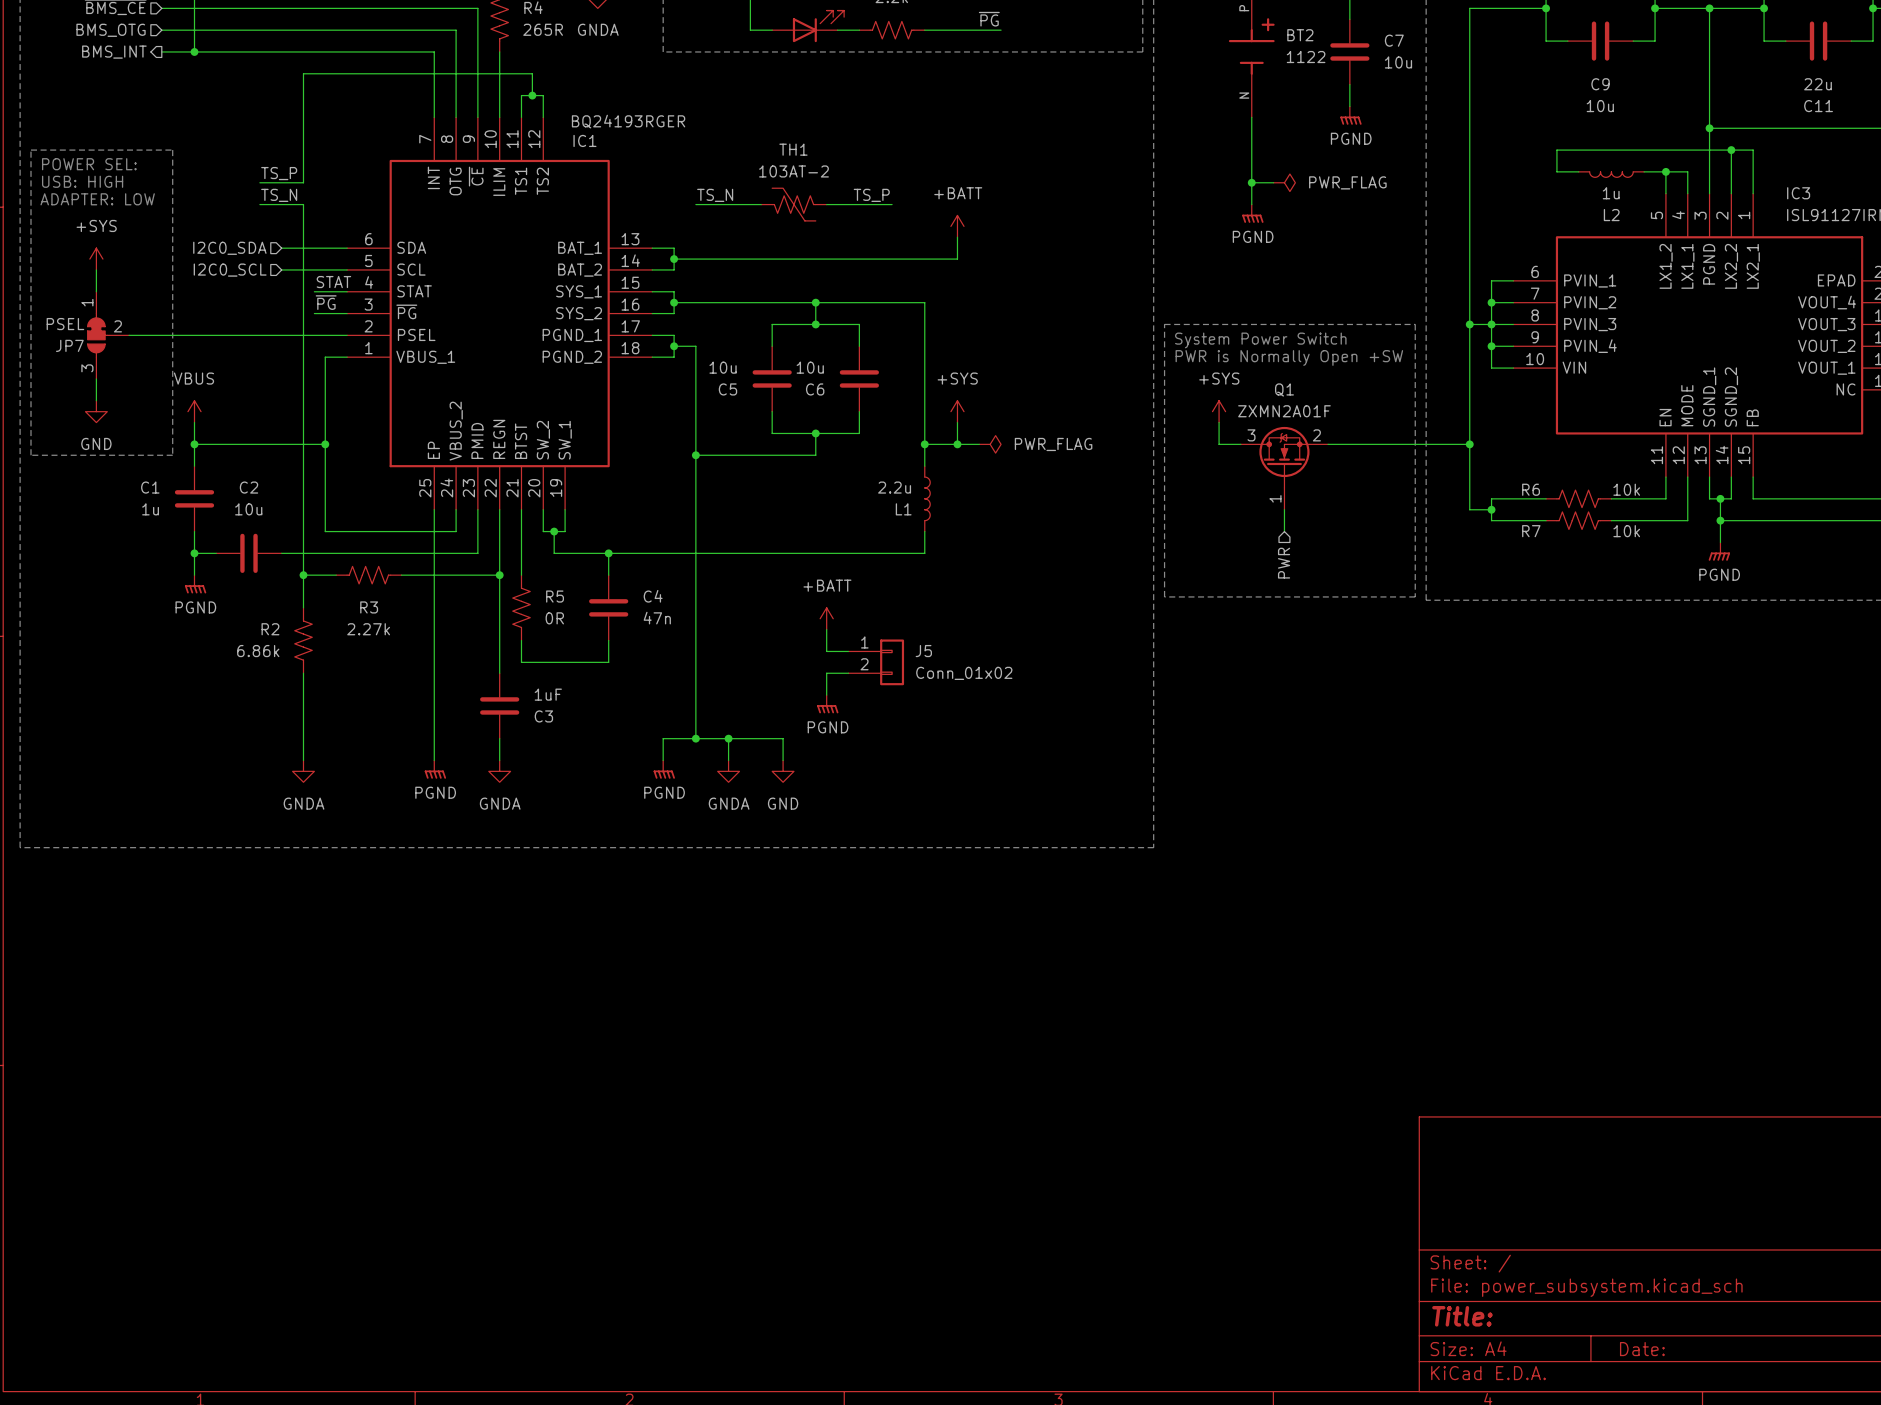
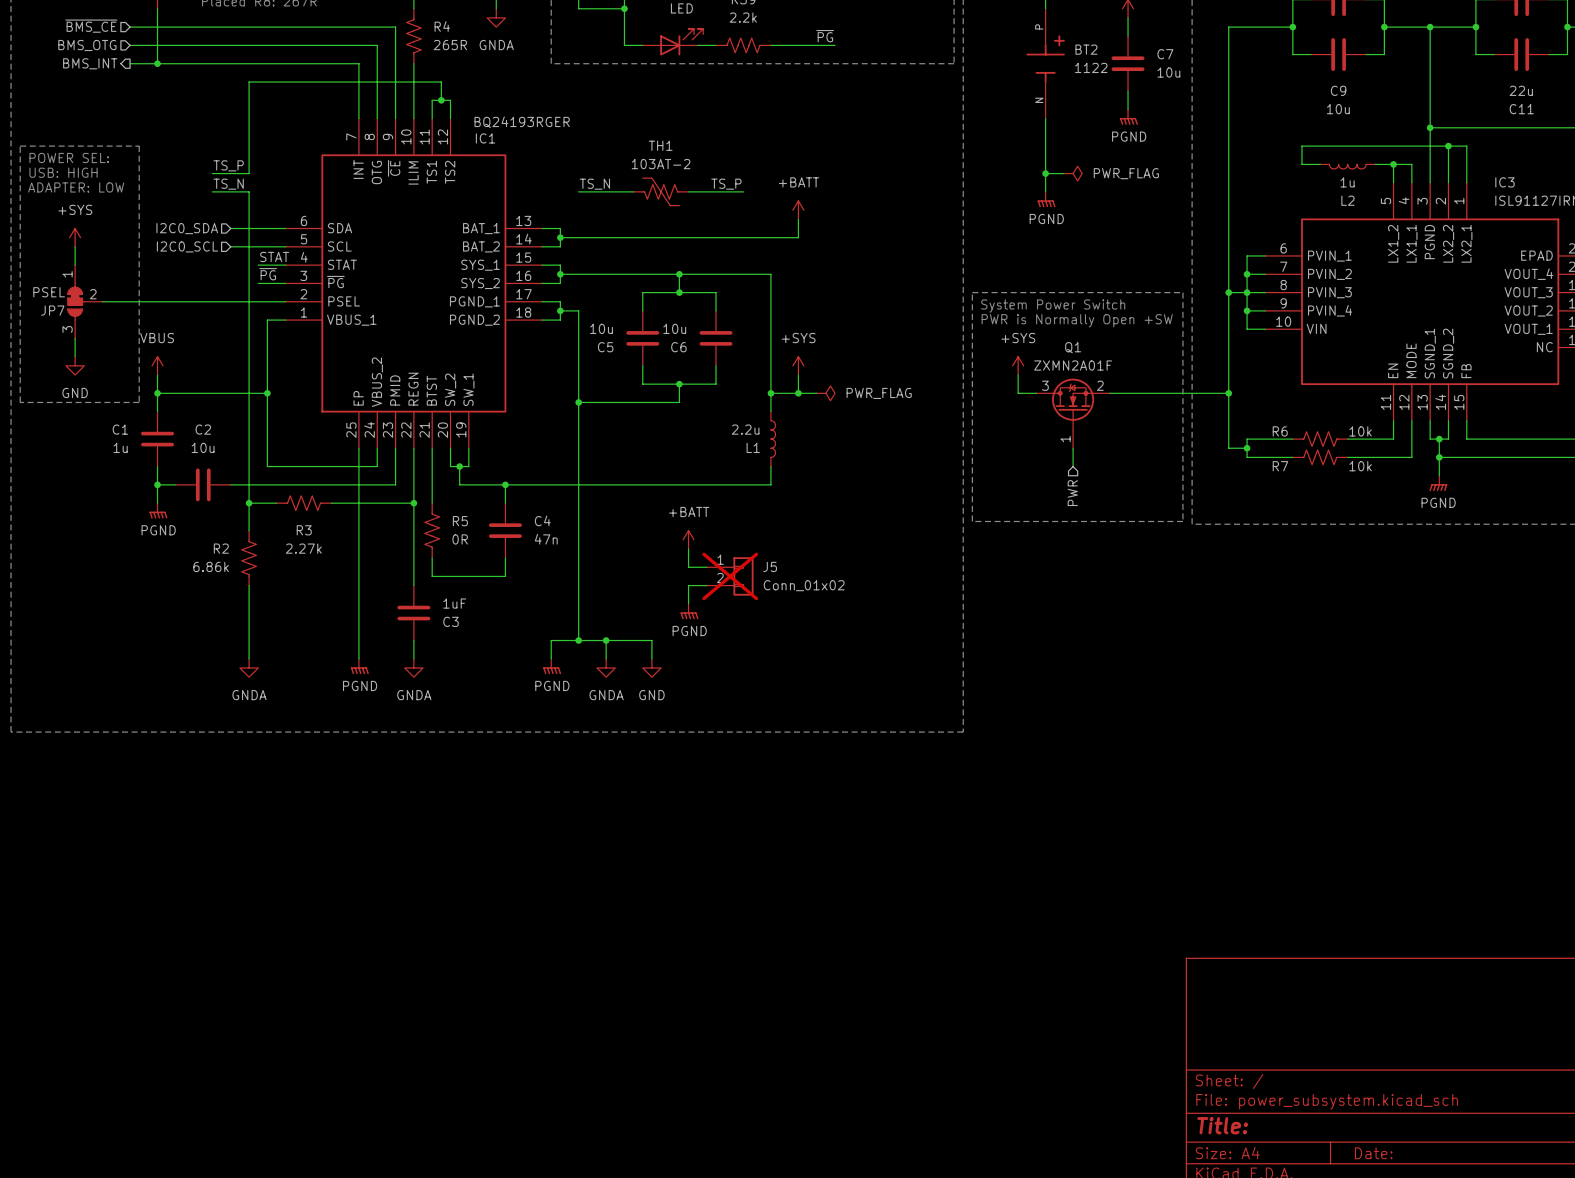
J5 do-not-place cross: none -> (730, 576)

